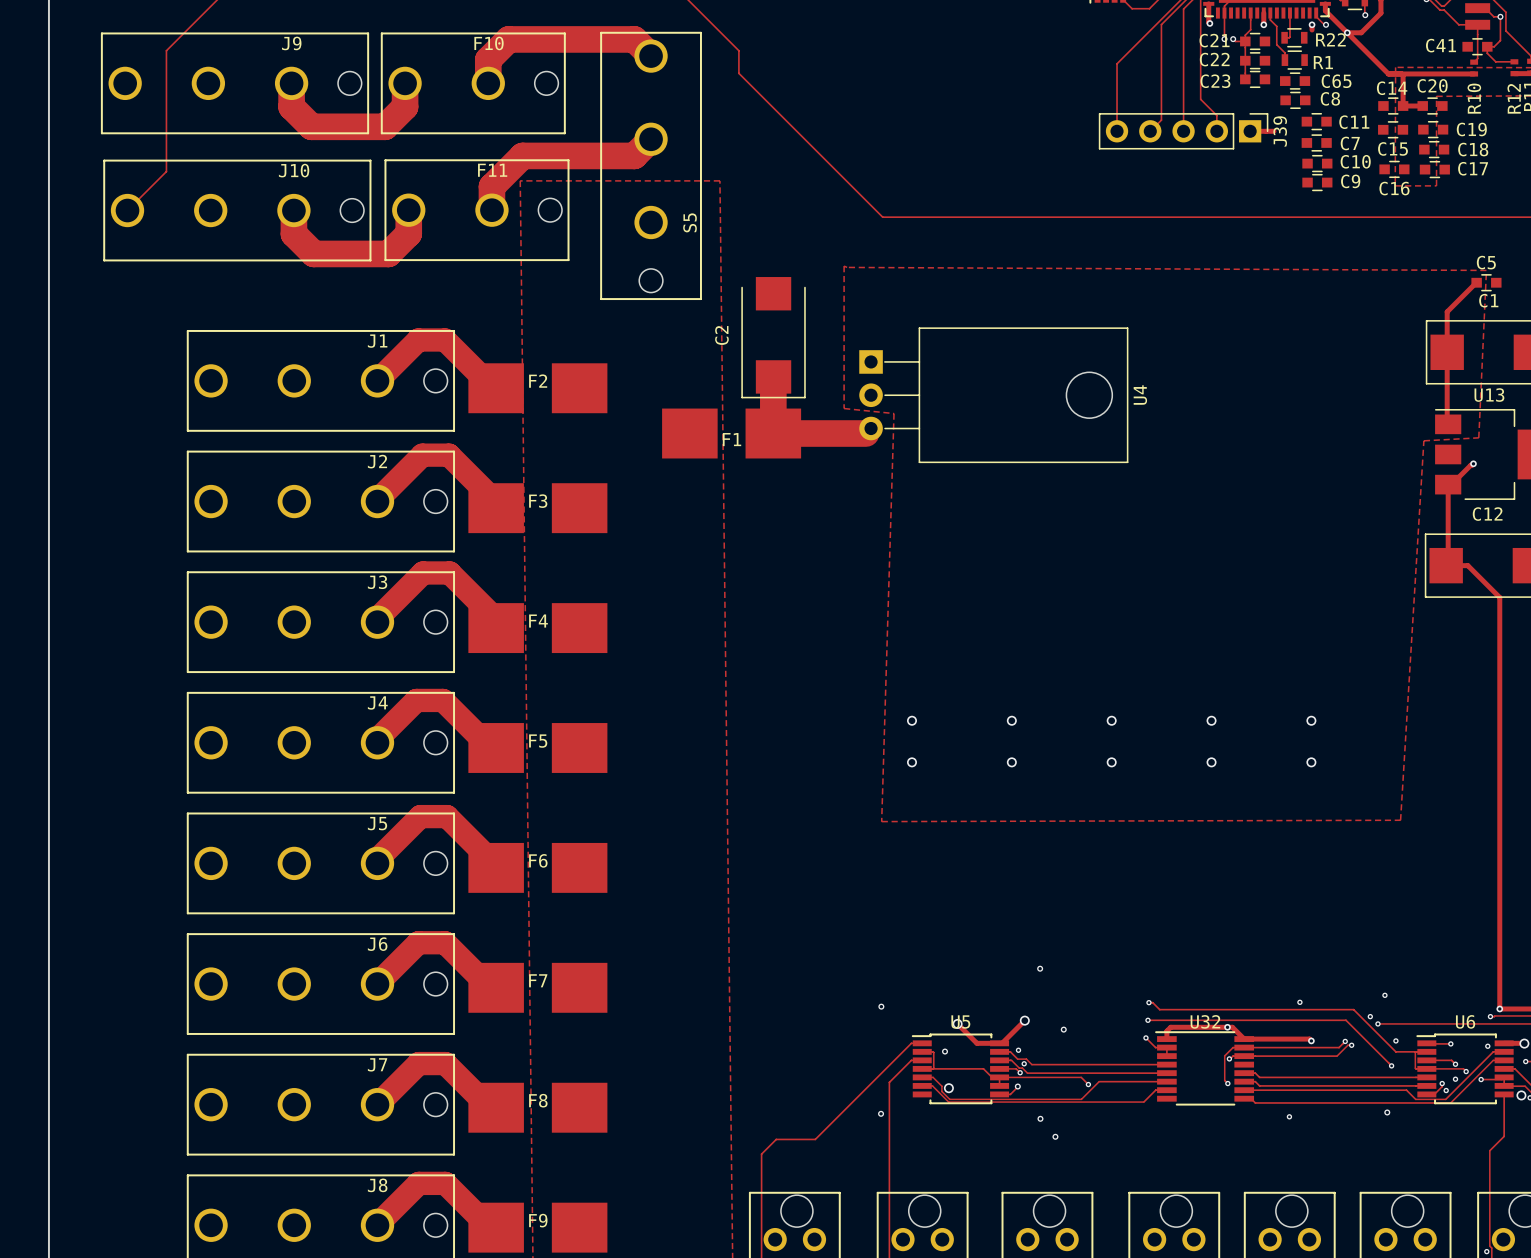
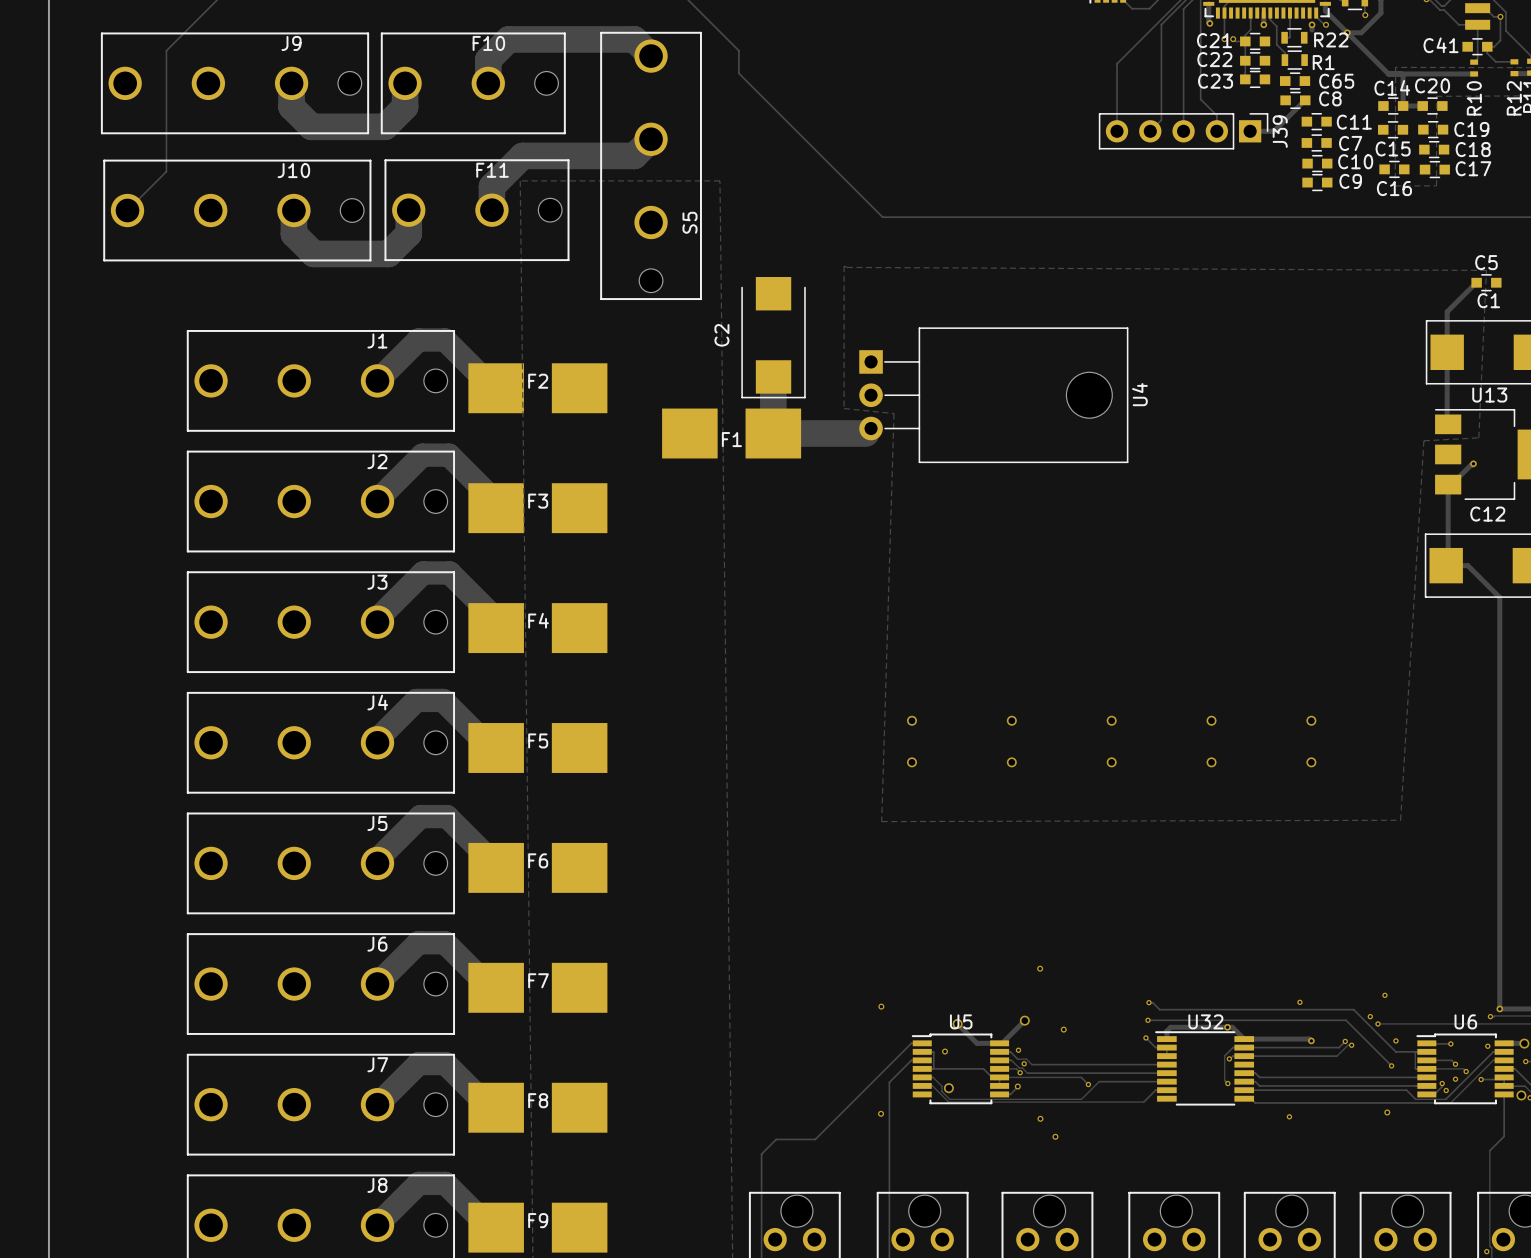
track: none -> (1305, 100) (1273, 131)

